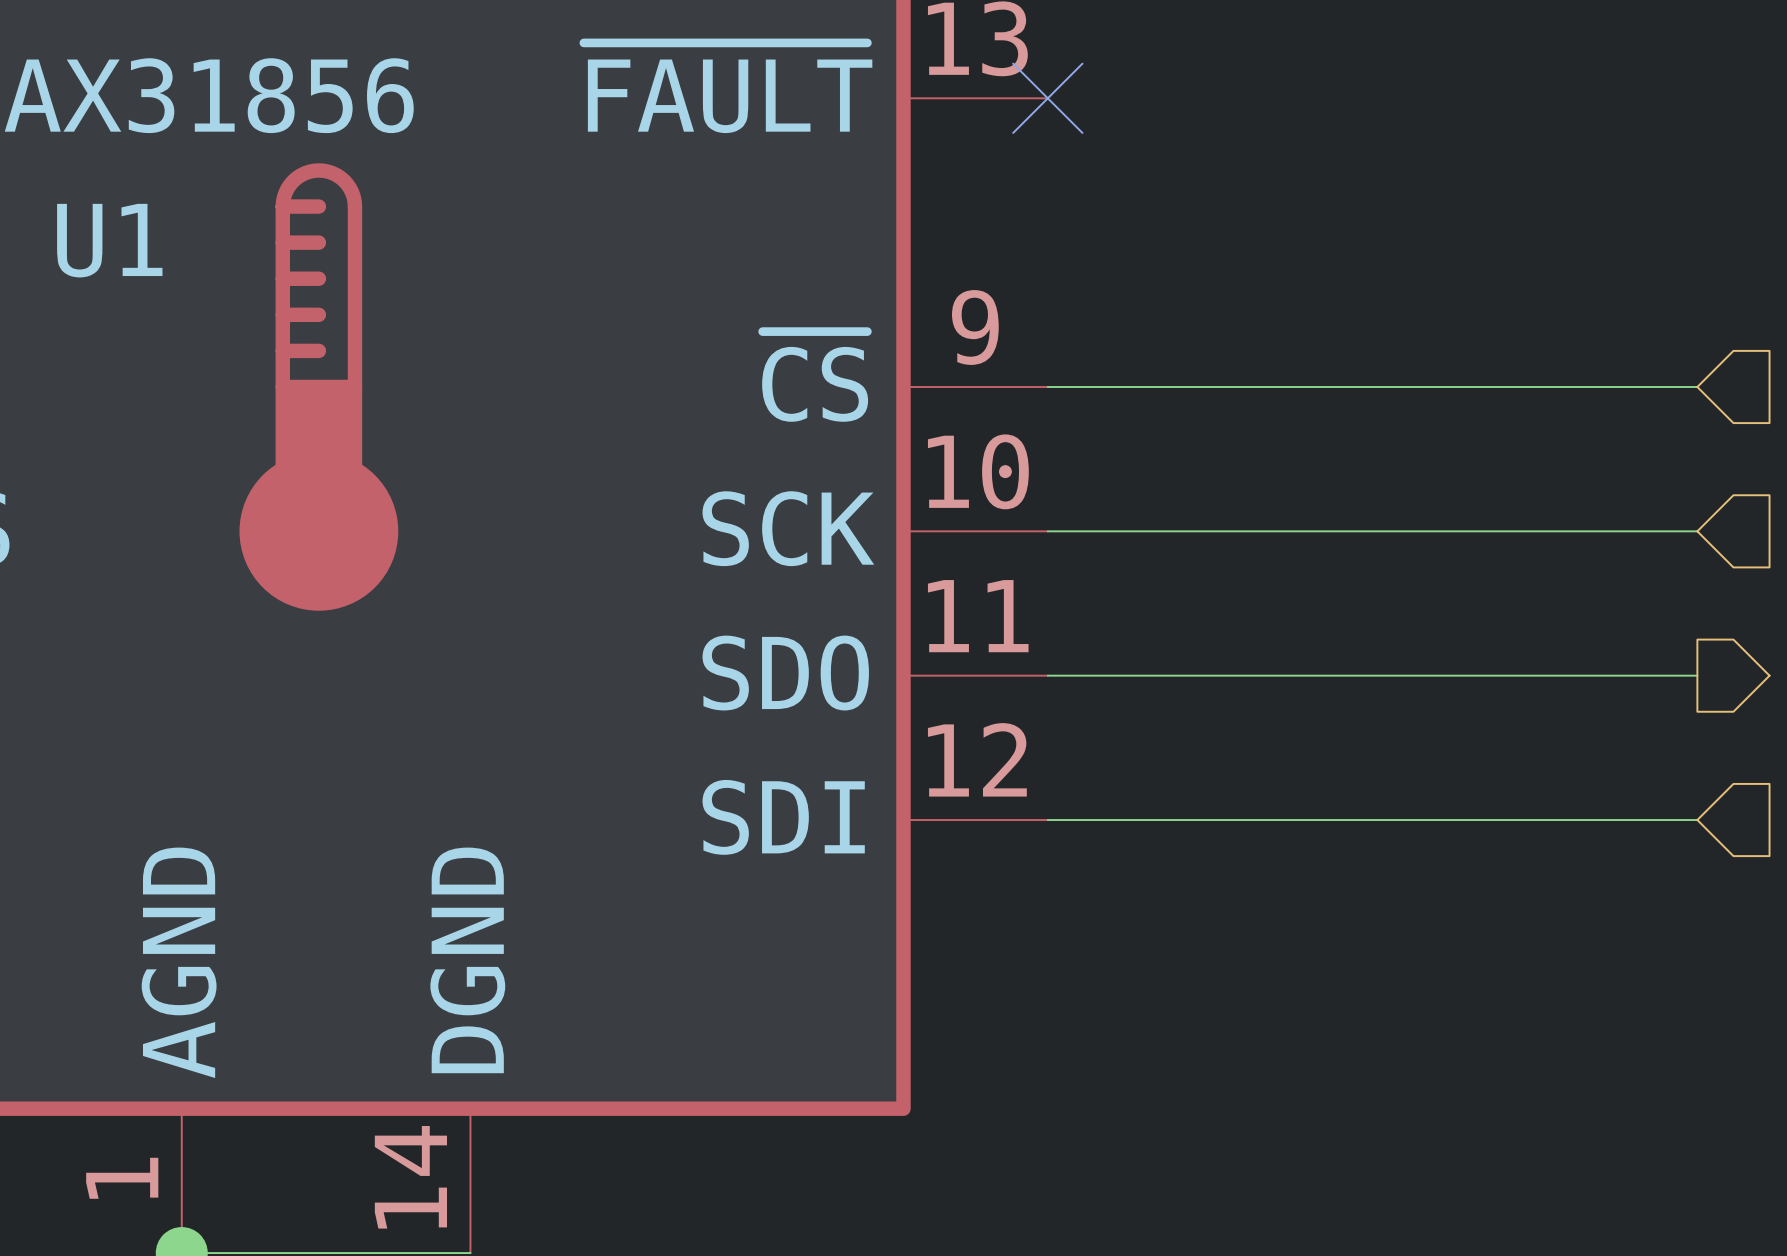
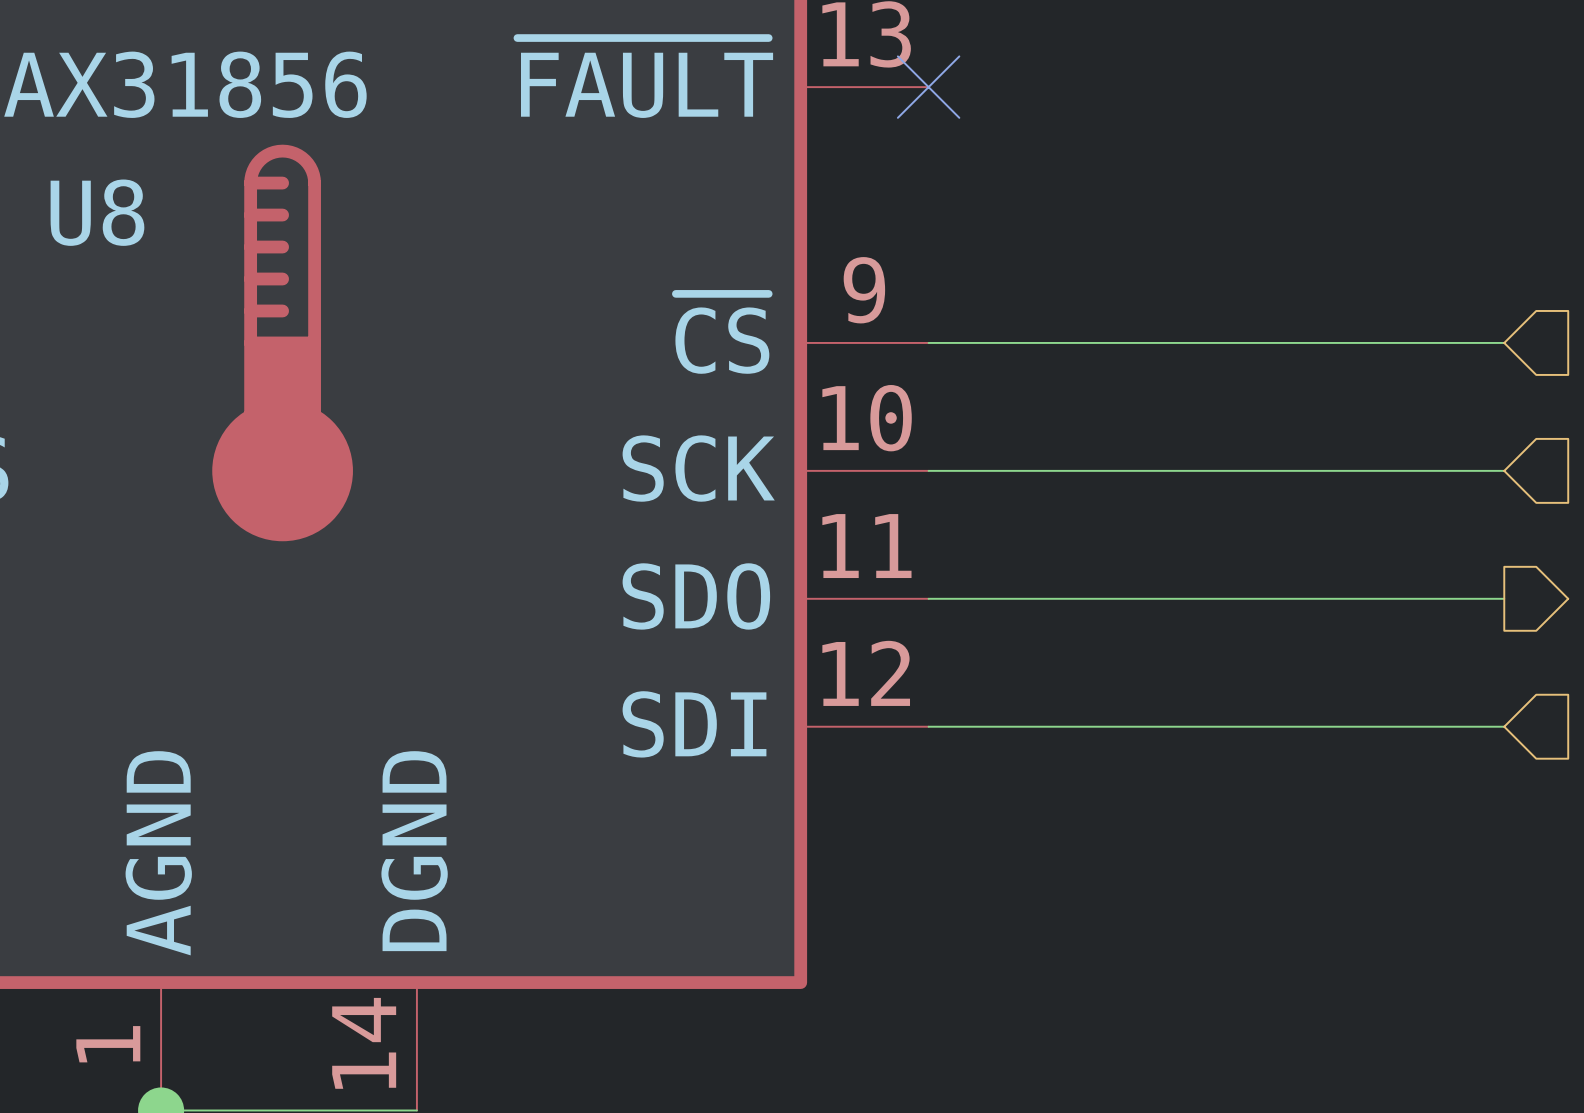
U1 name: U1 (109, 240) -> U8 (97, 212)

